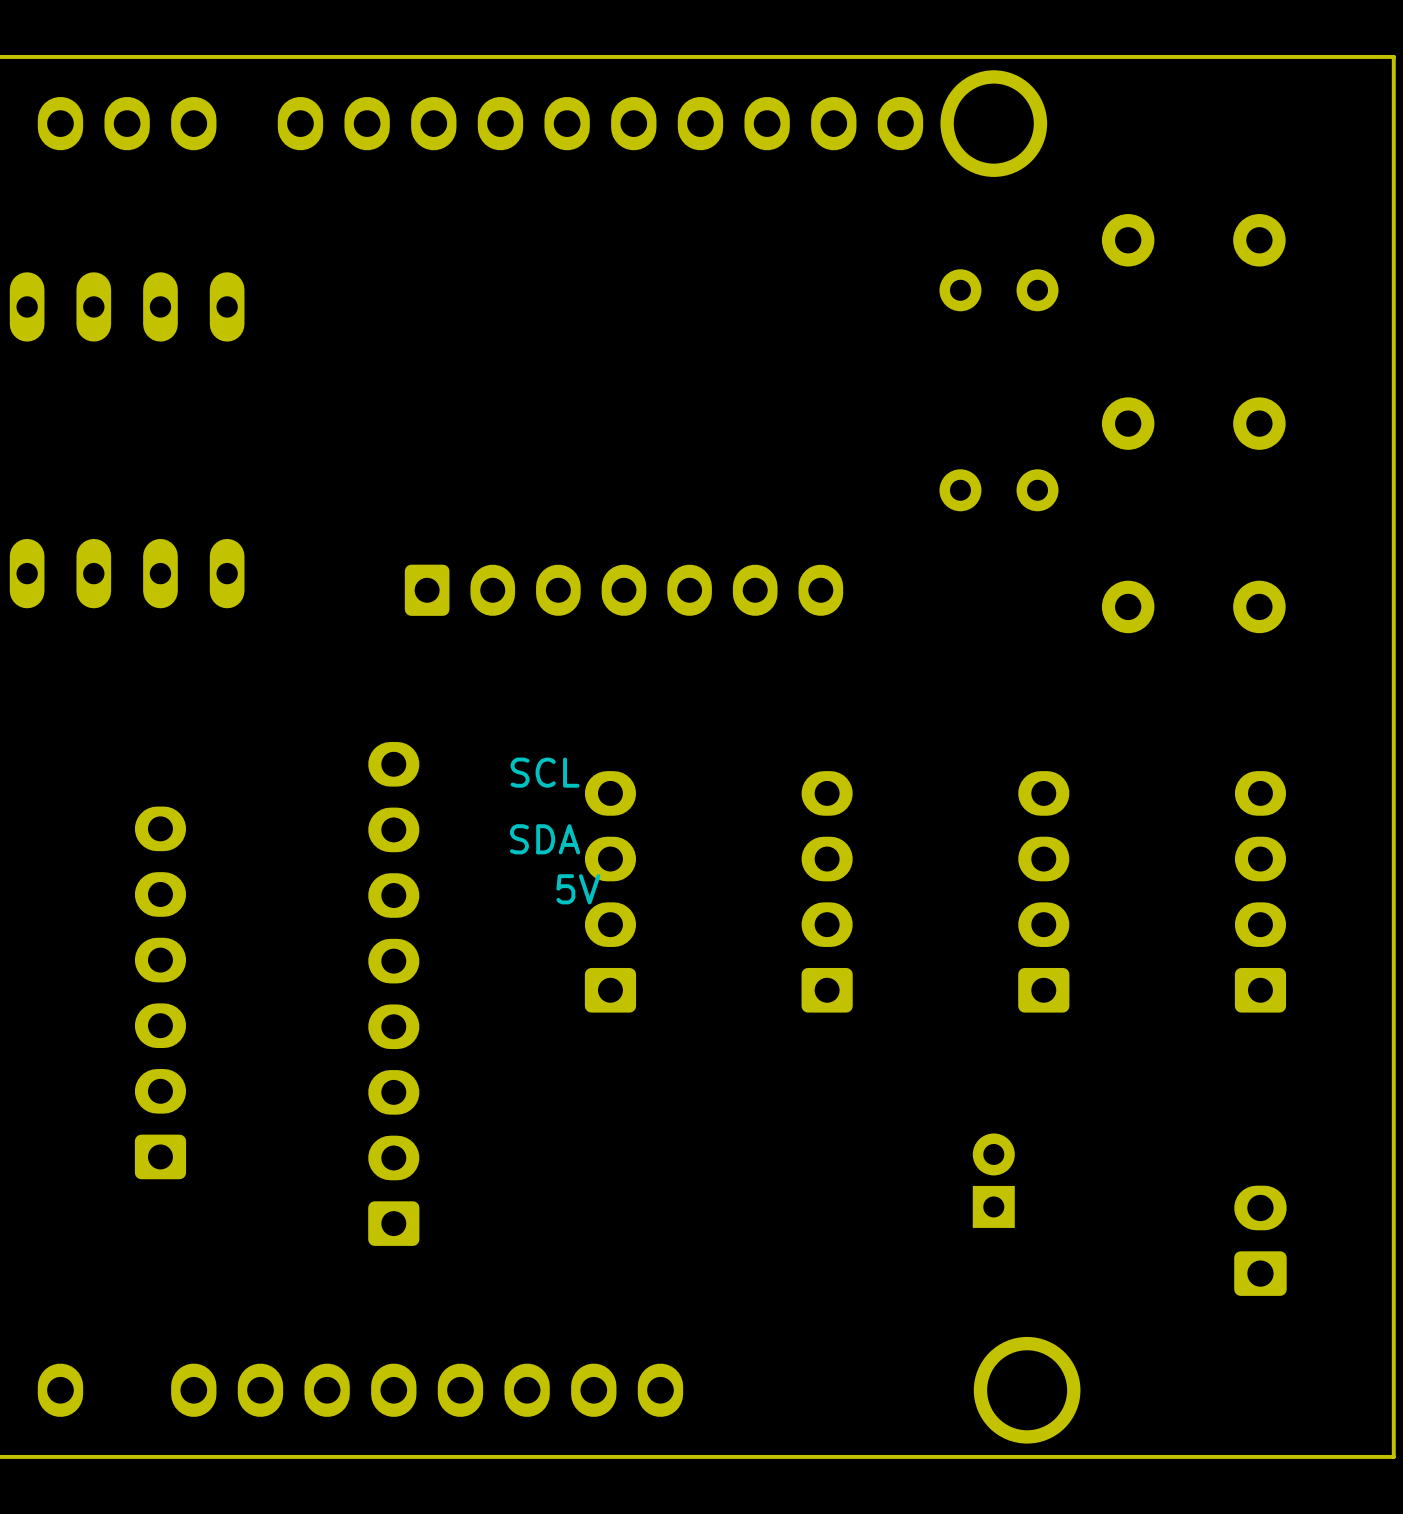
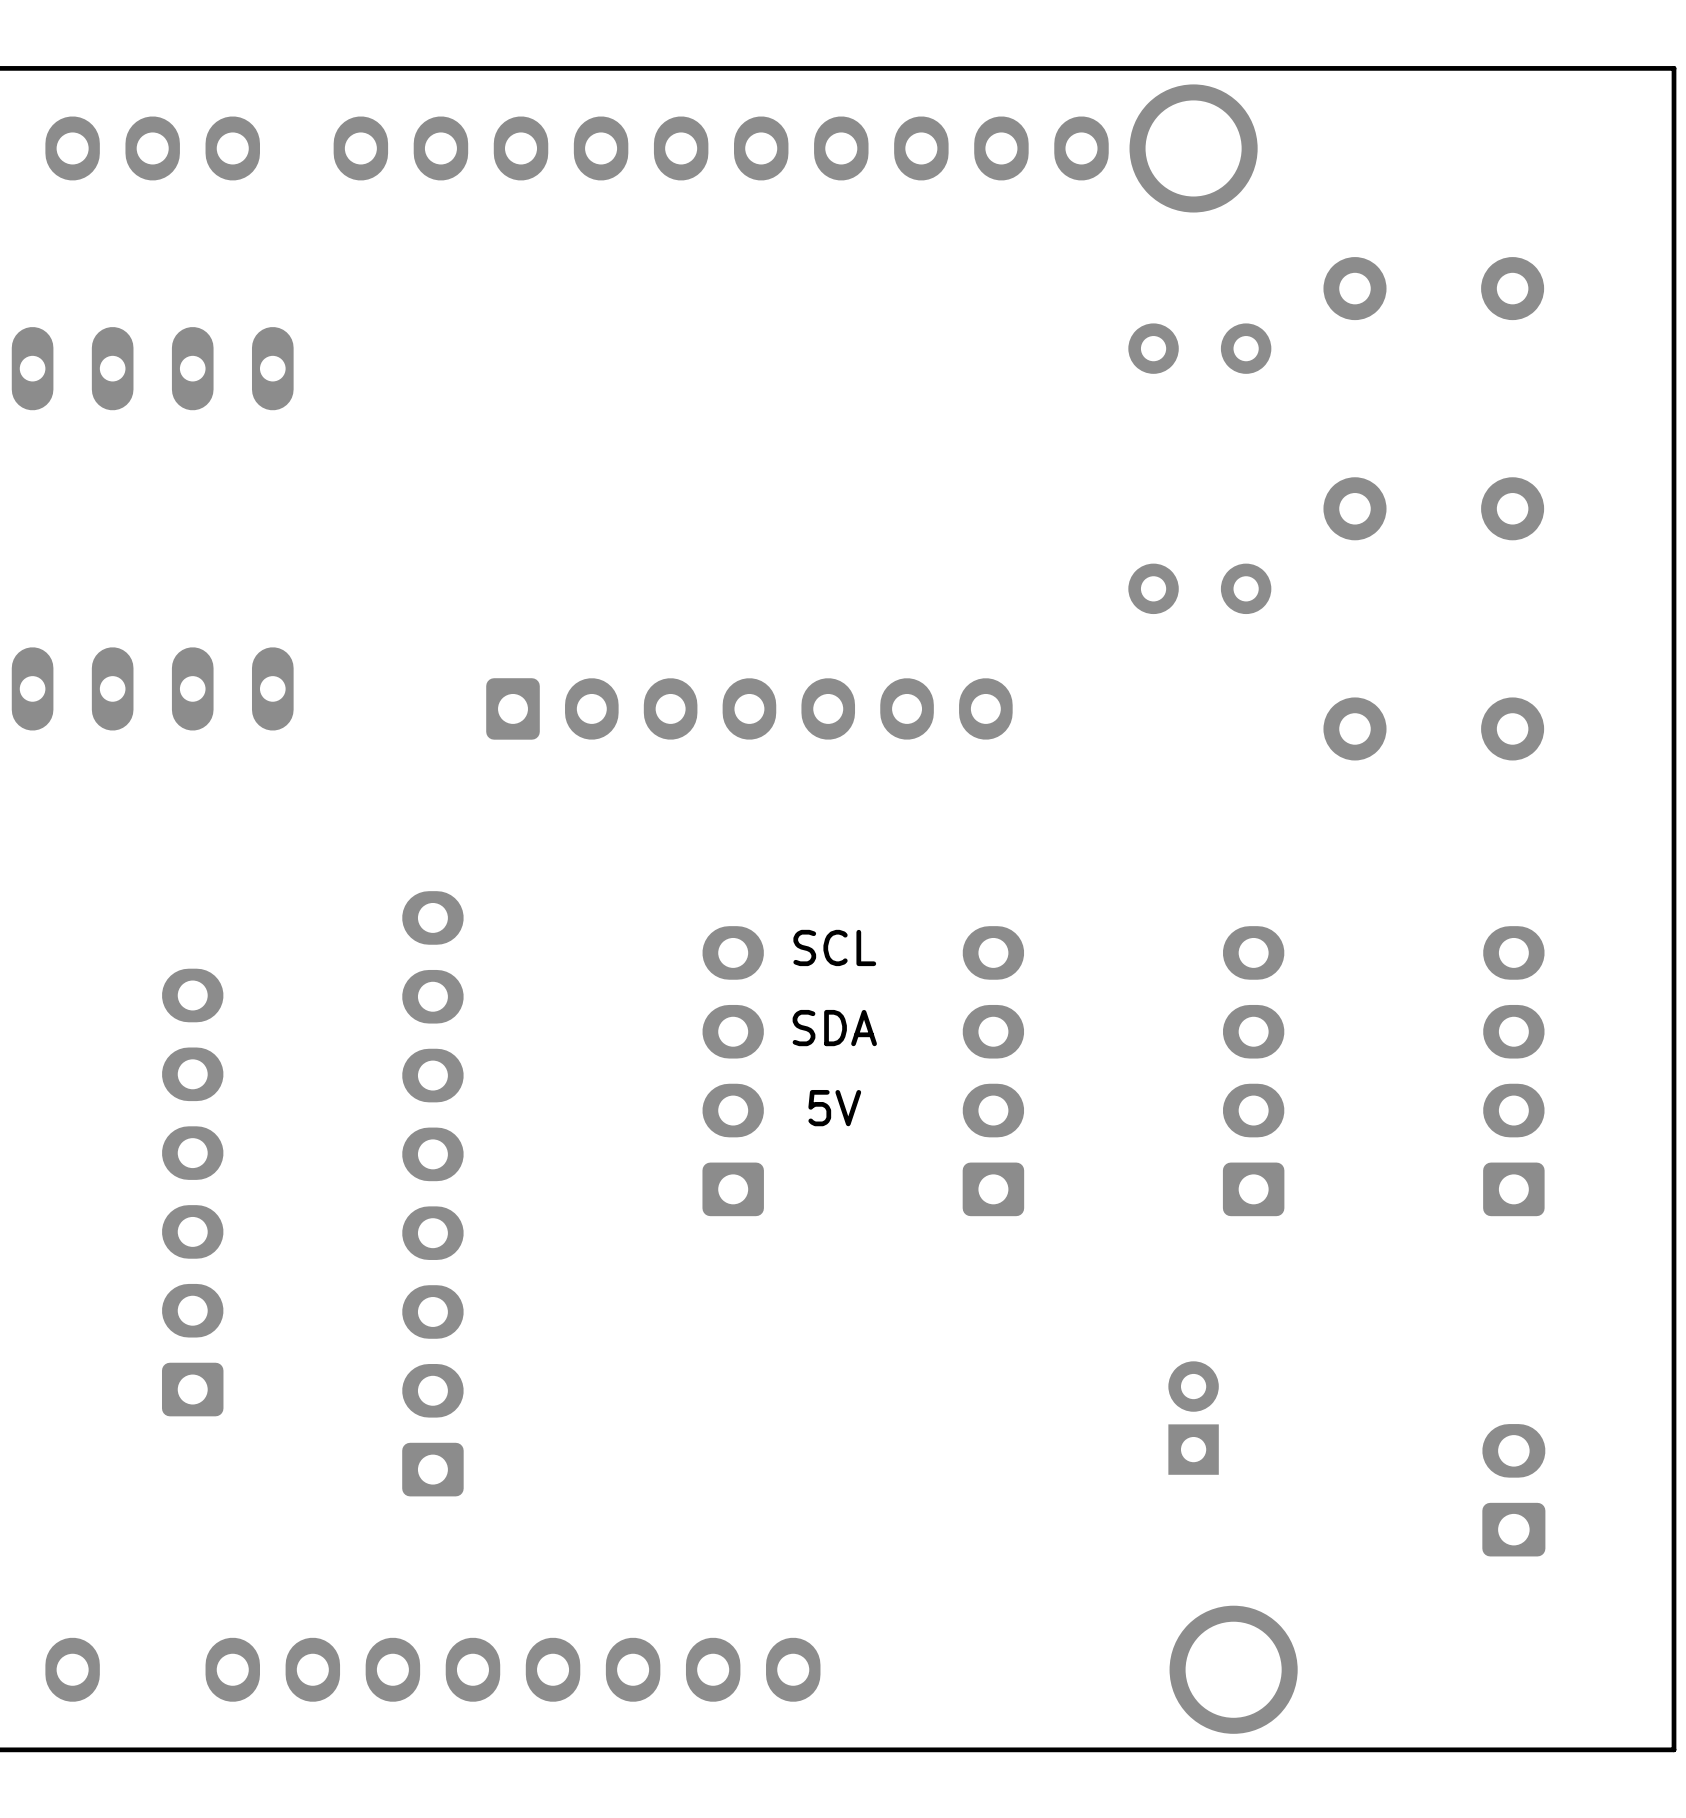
text position: SCL (545, 772) -> SCL (834, 947)
text position: SDA (545, 839) -> SDA (834, 1028)
text position: 5V (578, 889) -> 5V (834, 1108)
part position: (393, 993) -> (432, 1193)

